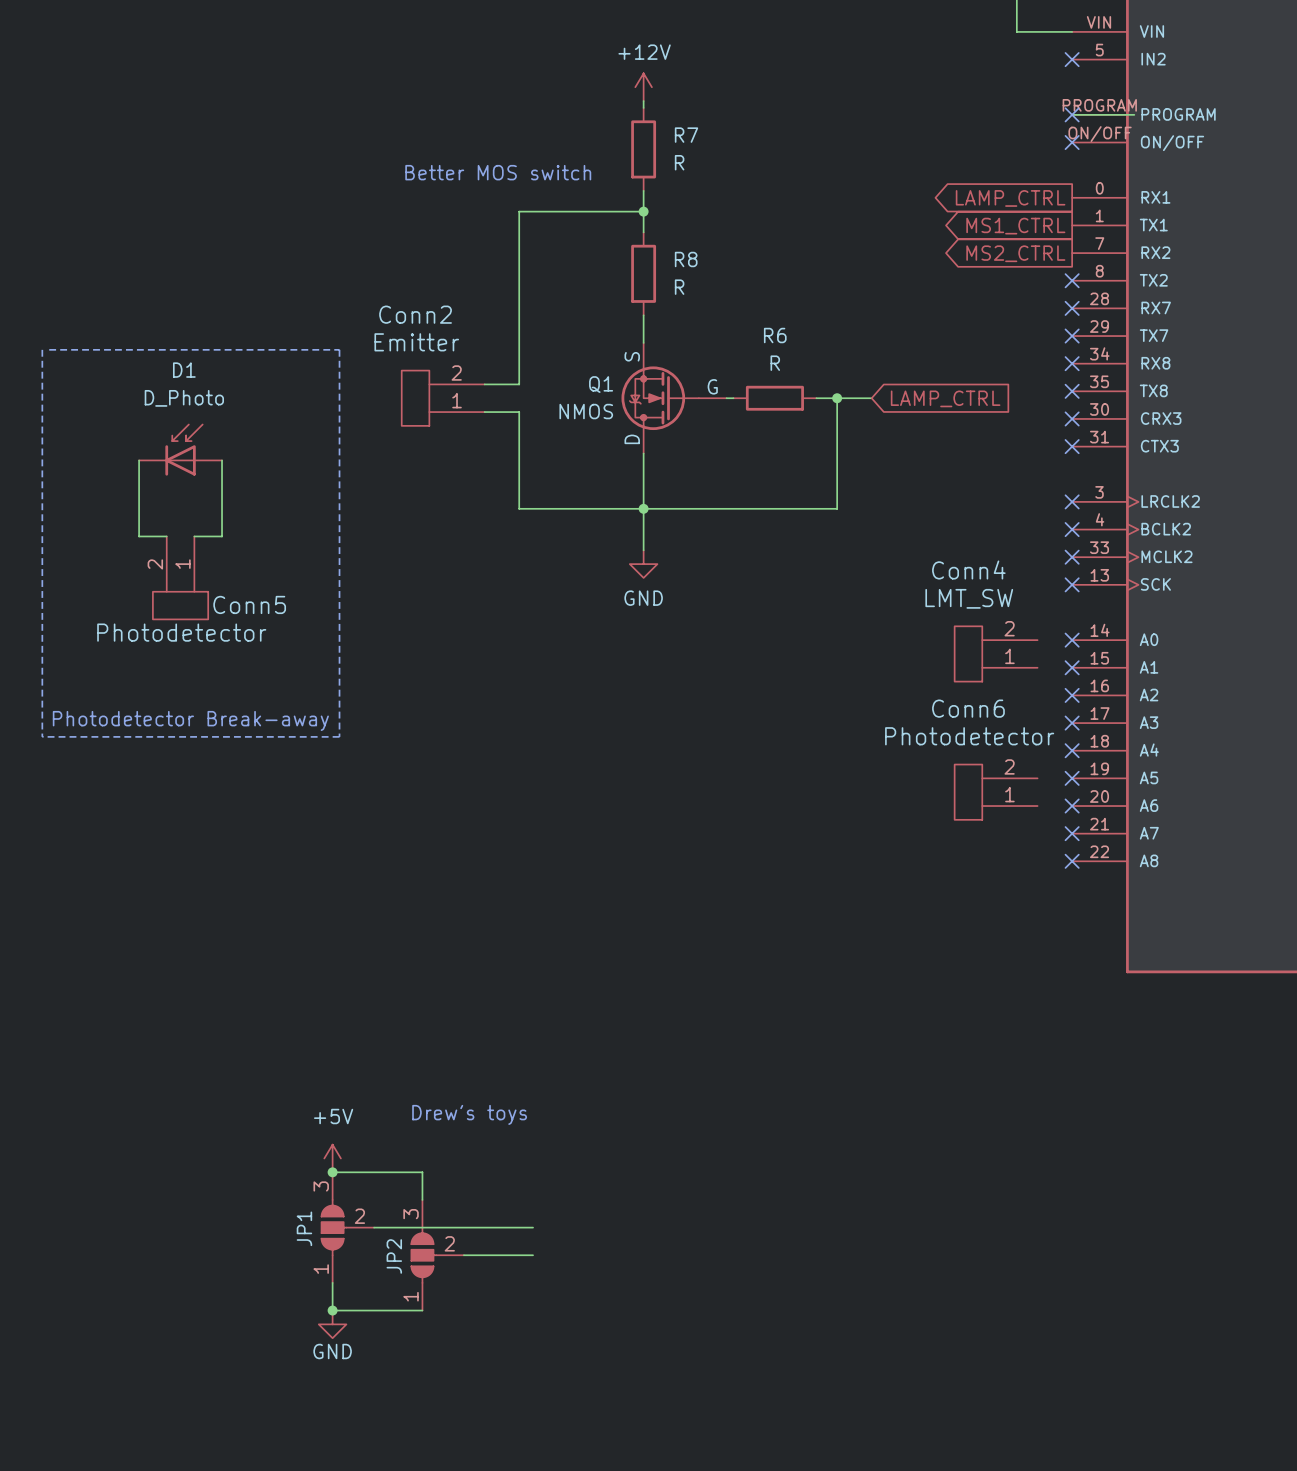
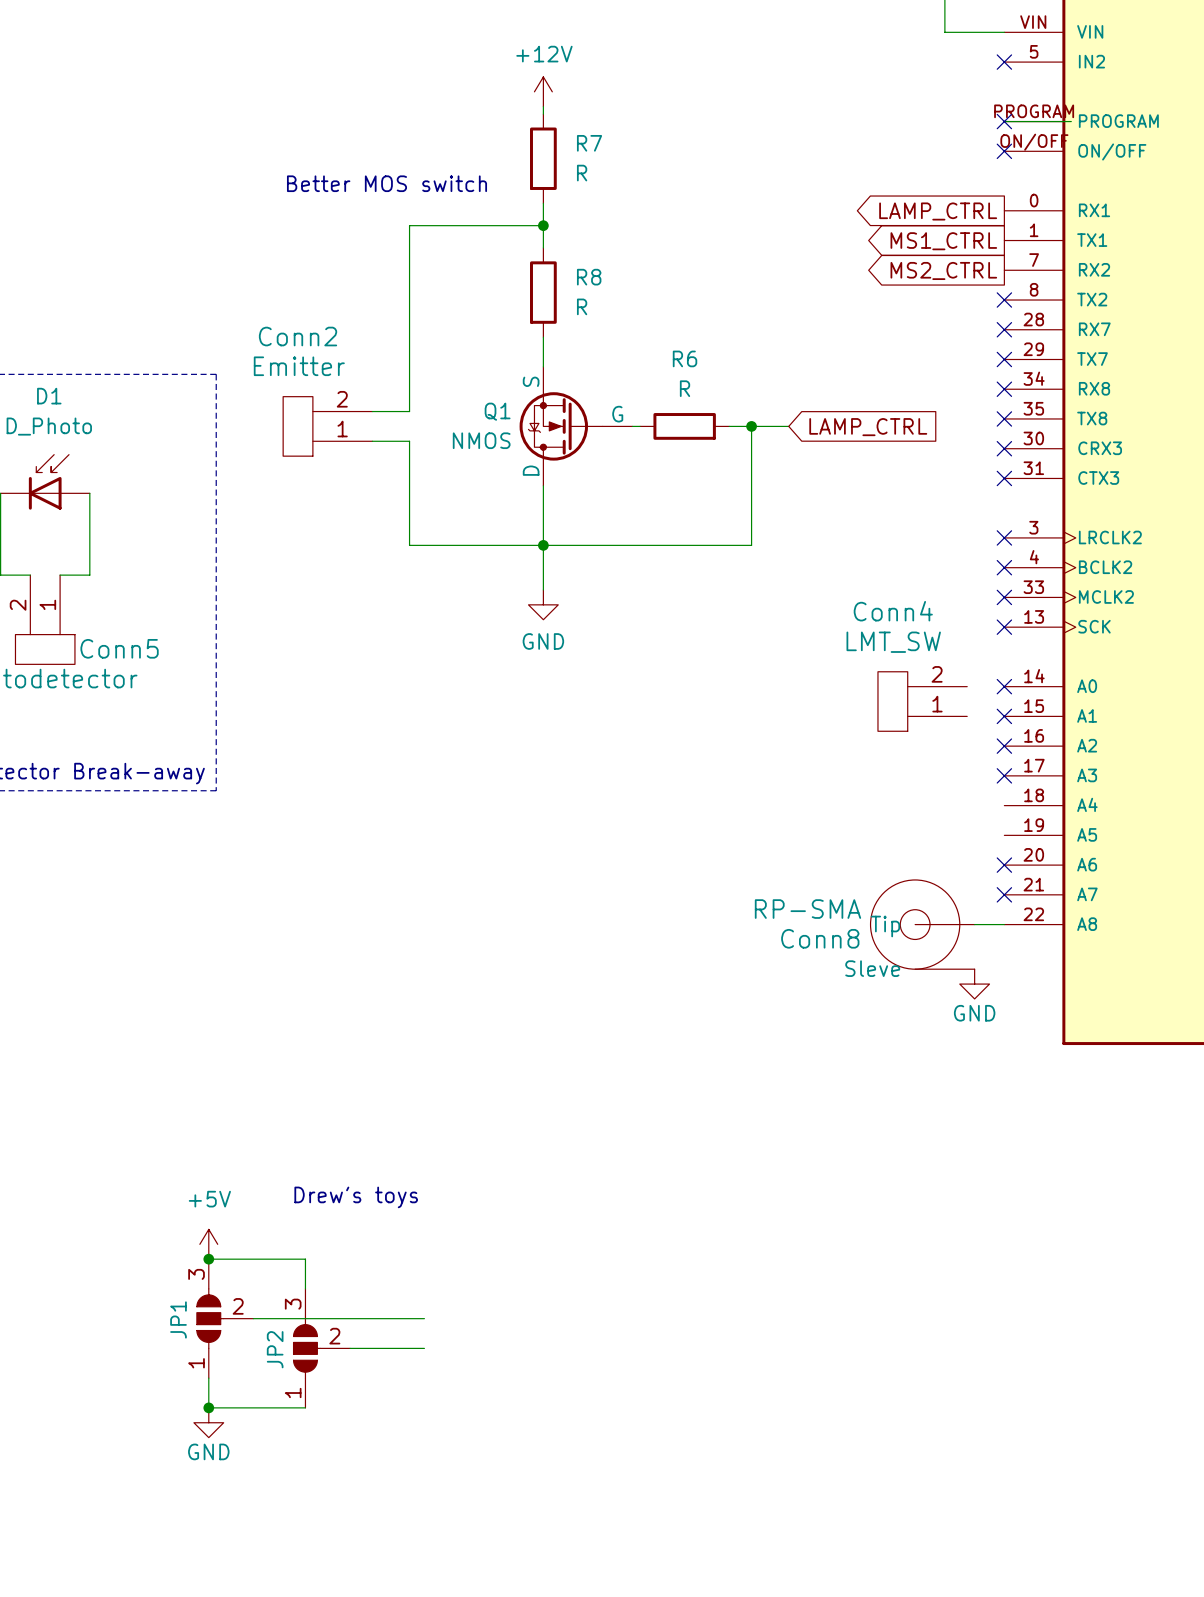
no-connect mark: (1072, 750) -> none
no-connect mark: (1072, 778) -> none
Conn6: Photodetector (996, 792) -> none
Conn8: none -> RP-SMA (922, 924)
wire: none -> (974, 924) (1004, 924)
no-connect mark: (1072, 861) -> none
power symbol: none -> GND (974, 984)

